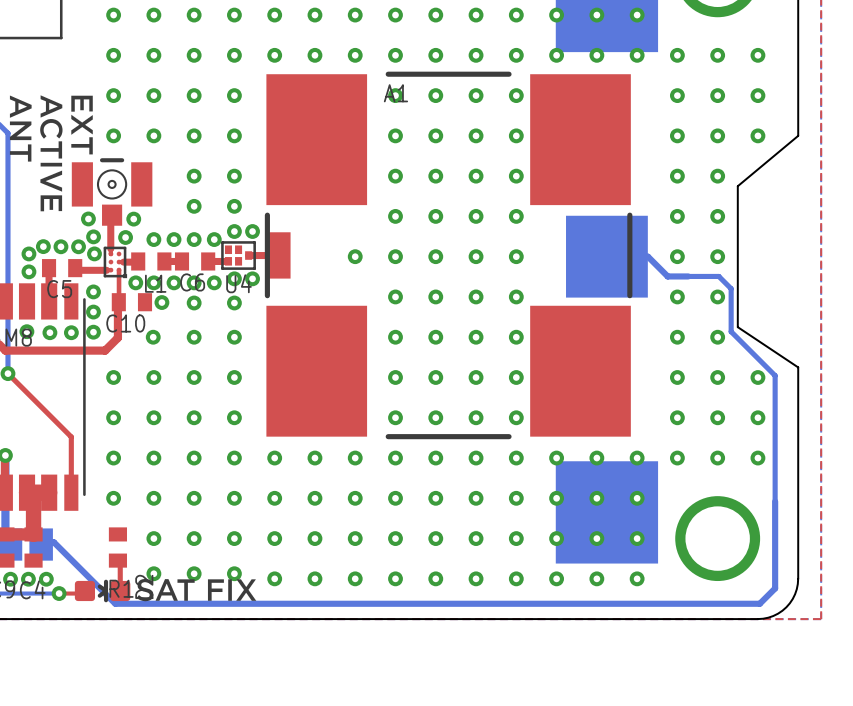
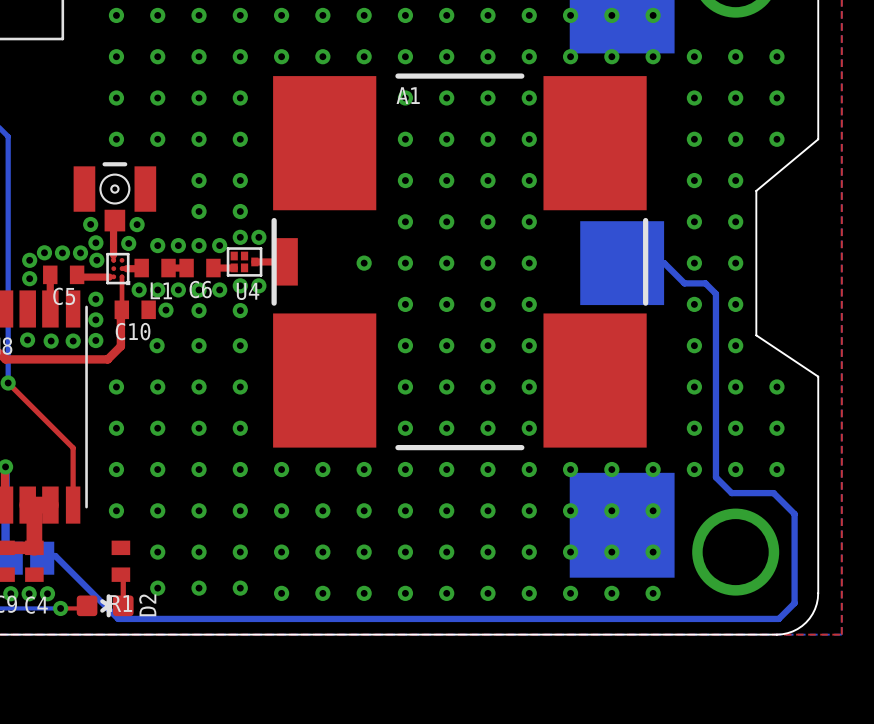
drawing: [9, 95, 93, 212] -> none
bottom track: (688, 276) (718, 276) (731, 288) (731, 331) (775, 375) (775, 501) -> (705, 283) (715, 293) (715, 477) (731, 493) (773, 493) (794, 514)
drawing: [136, 578, 257, 602] -> none

